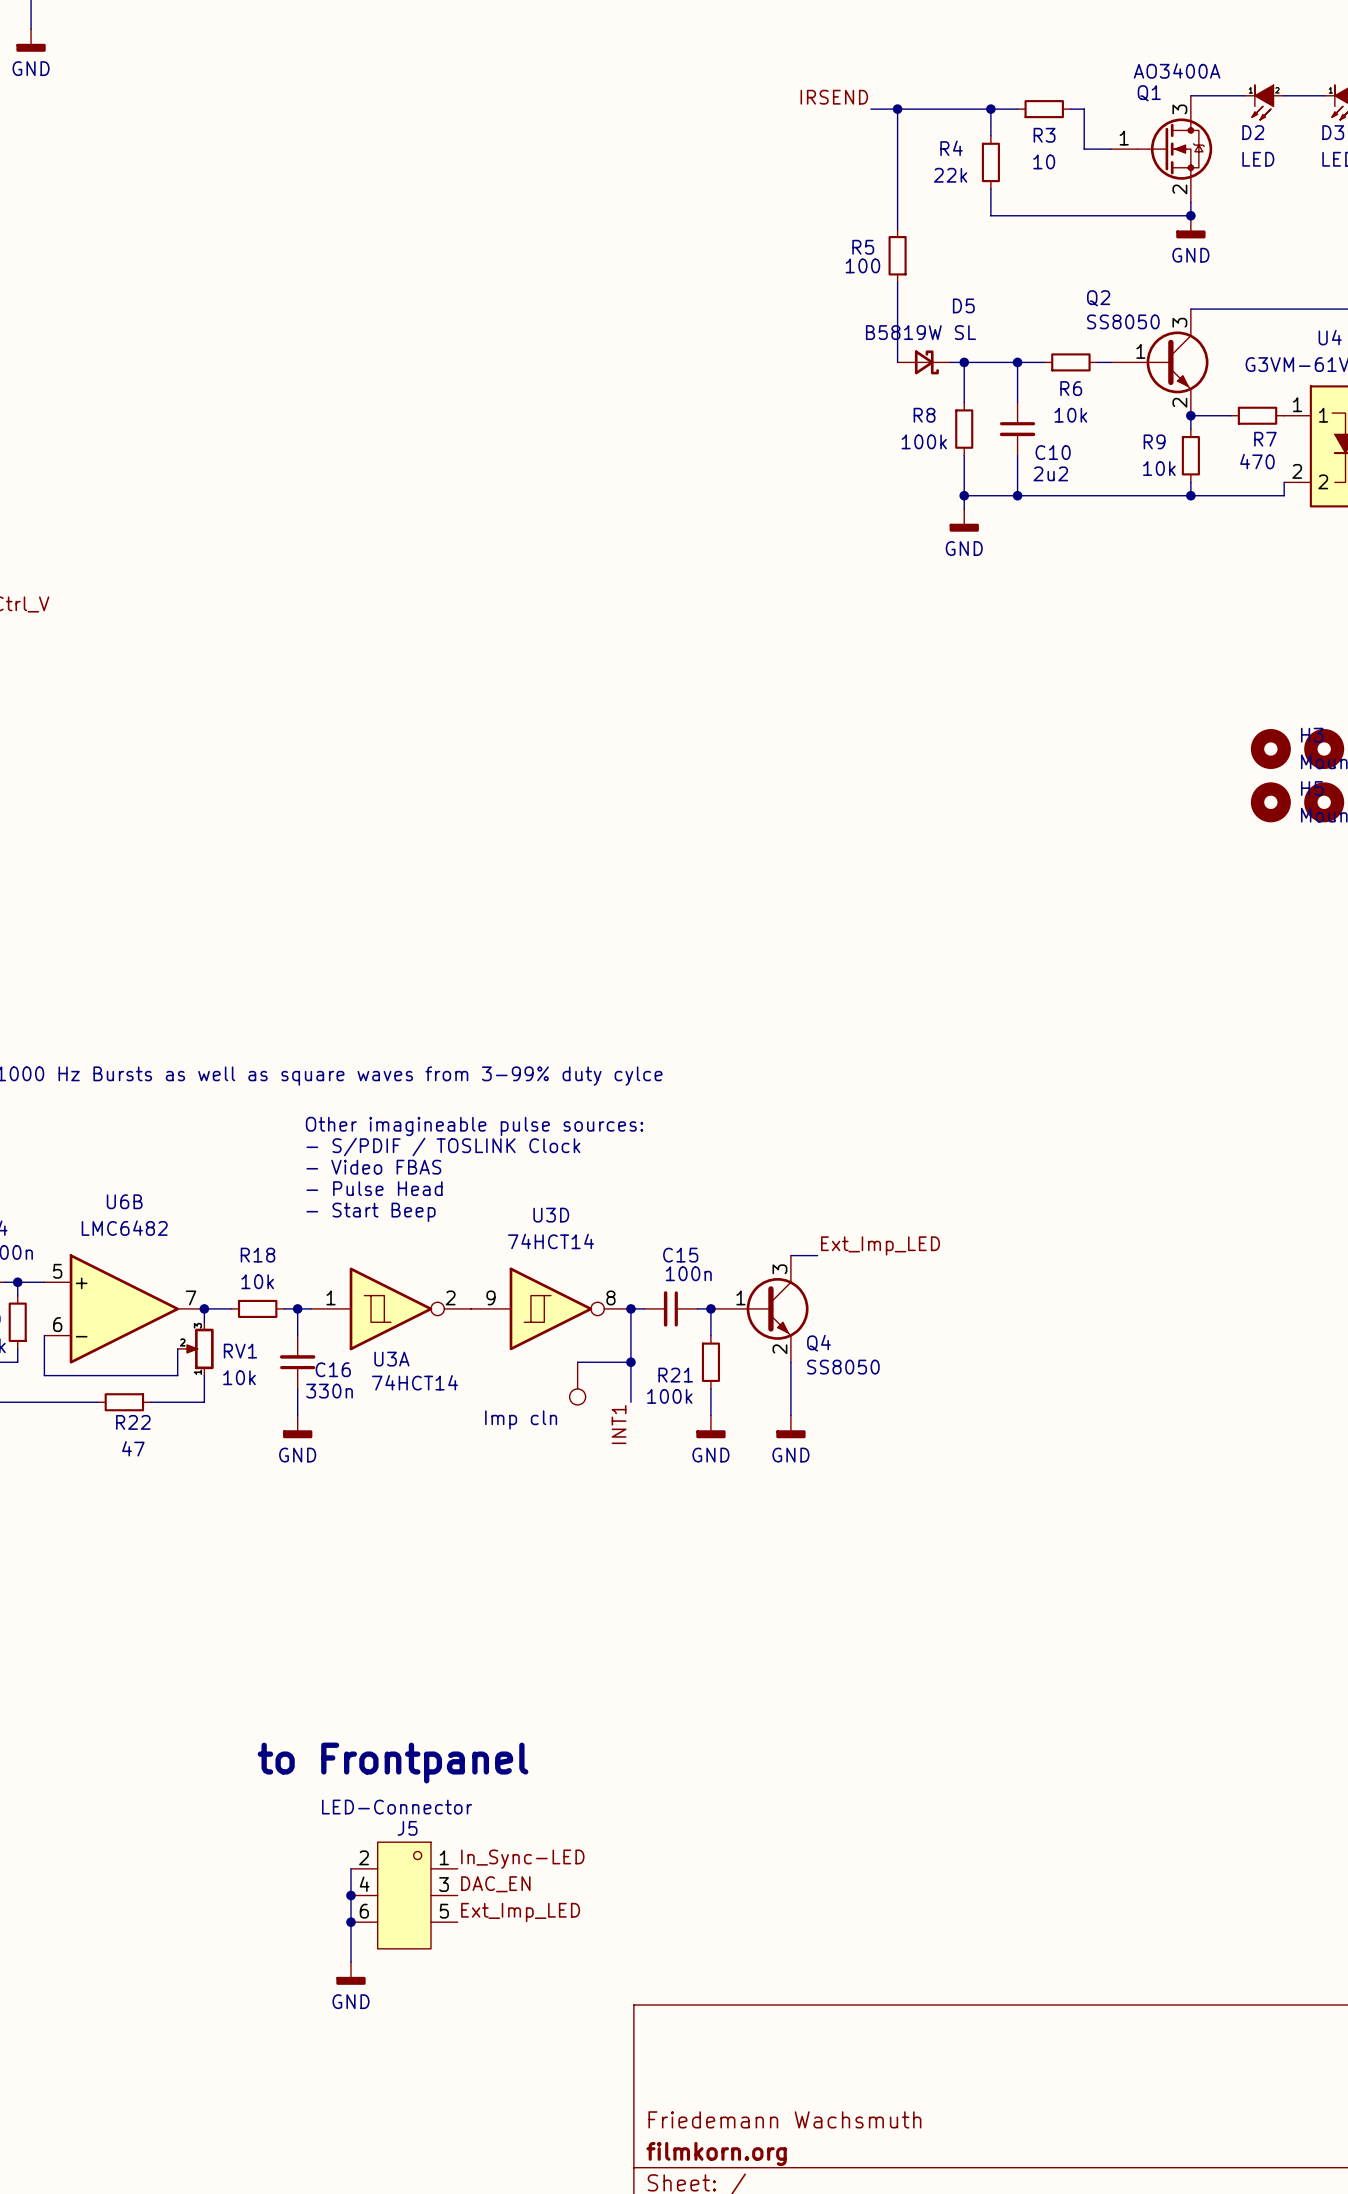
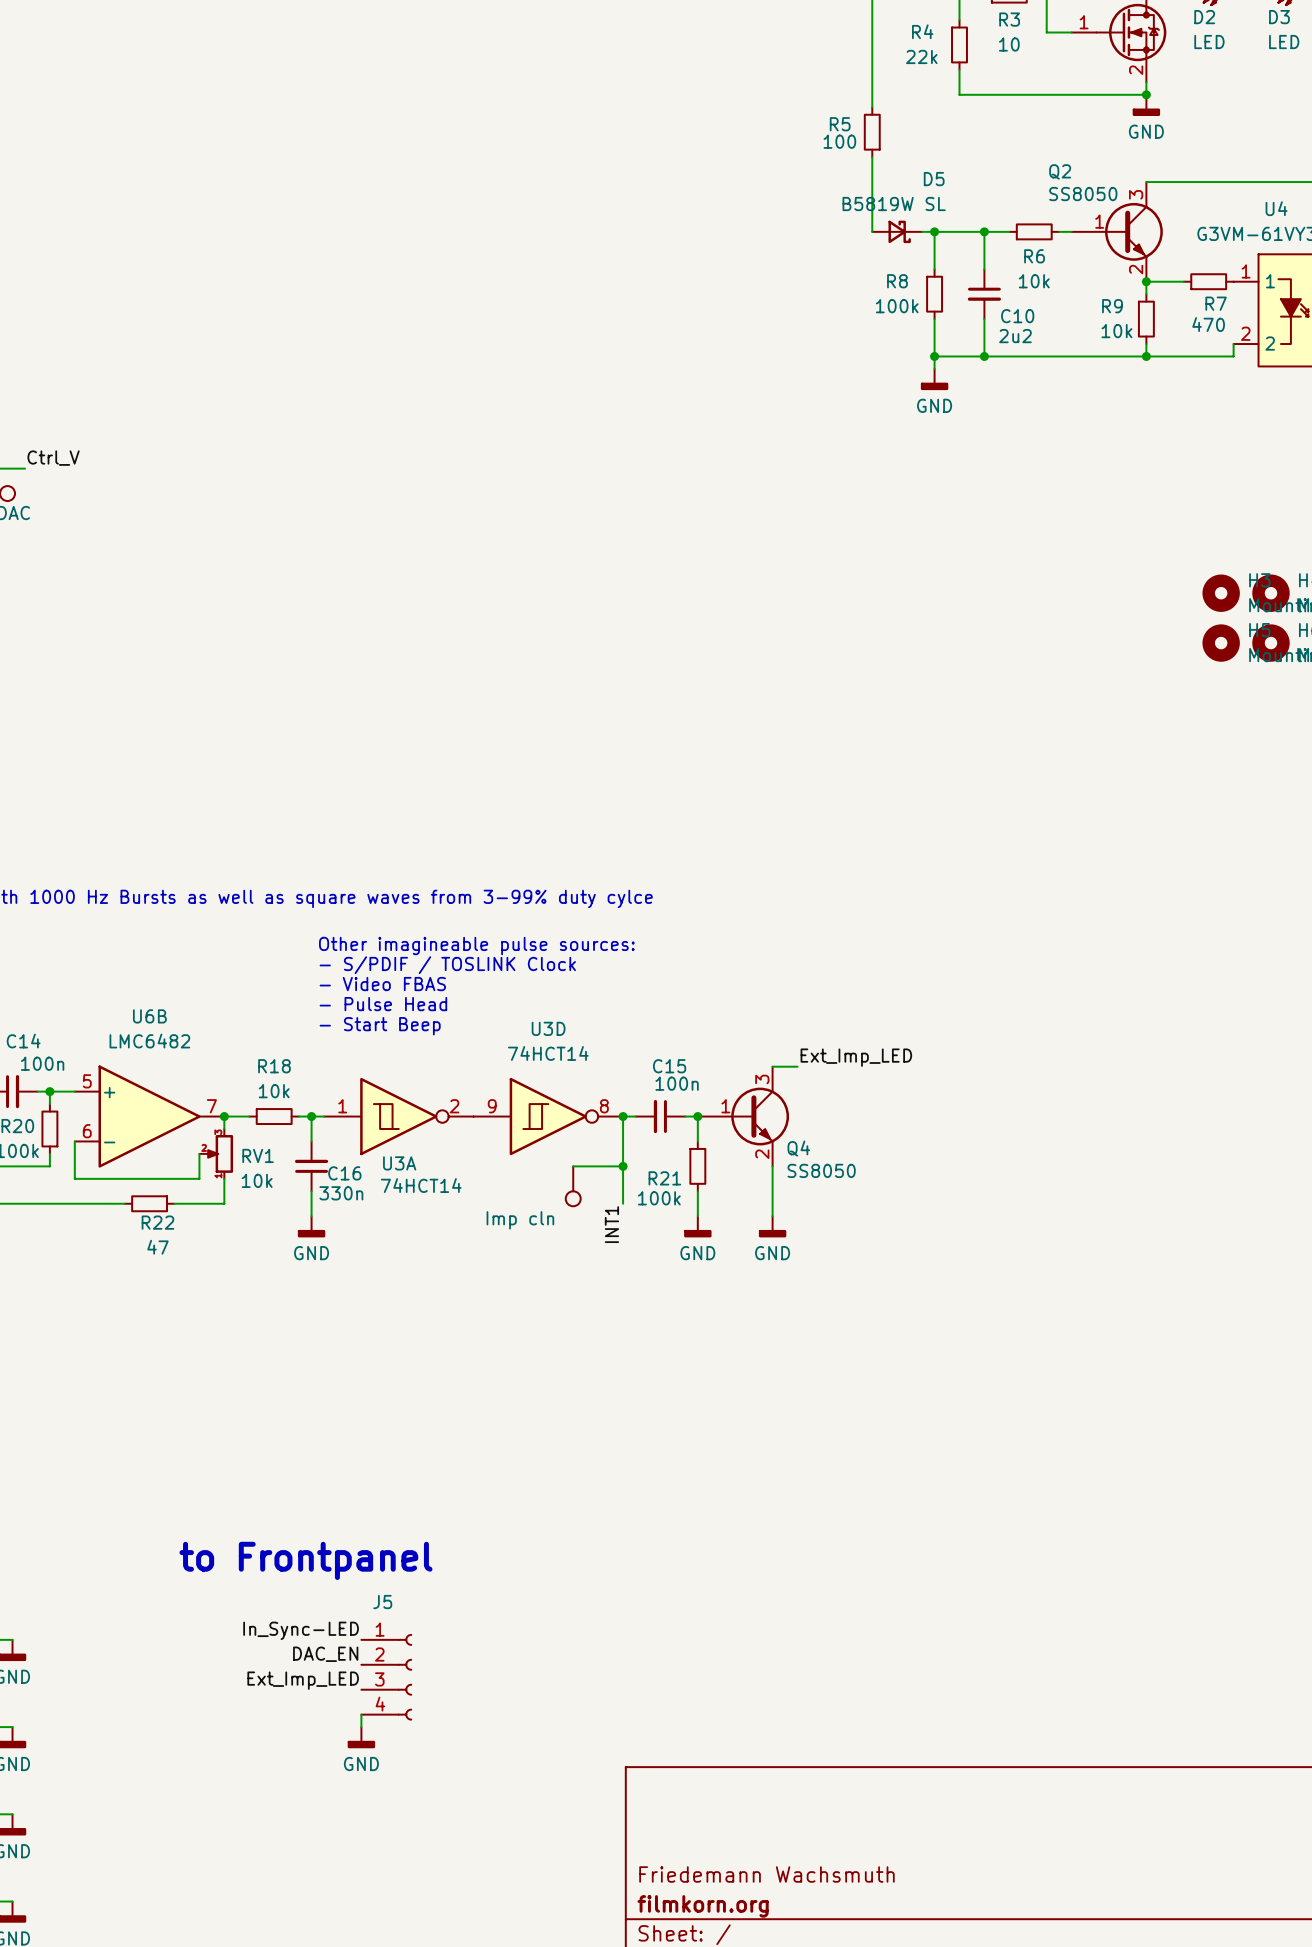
text position: to Frontpanel (393, 1763) -> to Frontpanel (305, 1560)
J5 value: LED-Connector (397, 1807) -> none
J5 symbol: [351, 1842, 458, 1949] -> [361, 1634, 412, 1721]
label position: In_Sync-LED (522, 1859) -> In_Sync-LED (301, 1630)
wire: (351, 1868) (351, 1948) -> none
label position: DAC_EN (495, 1884) -> DAC_EN (325, 1654)
junction: (351, 1895) -> none
label position: Ext_Imp_LED (520, 1912) -> Ext_Imp_LED (303, 1680)
junction: (351, 1922) -> none

